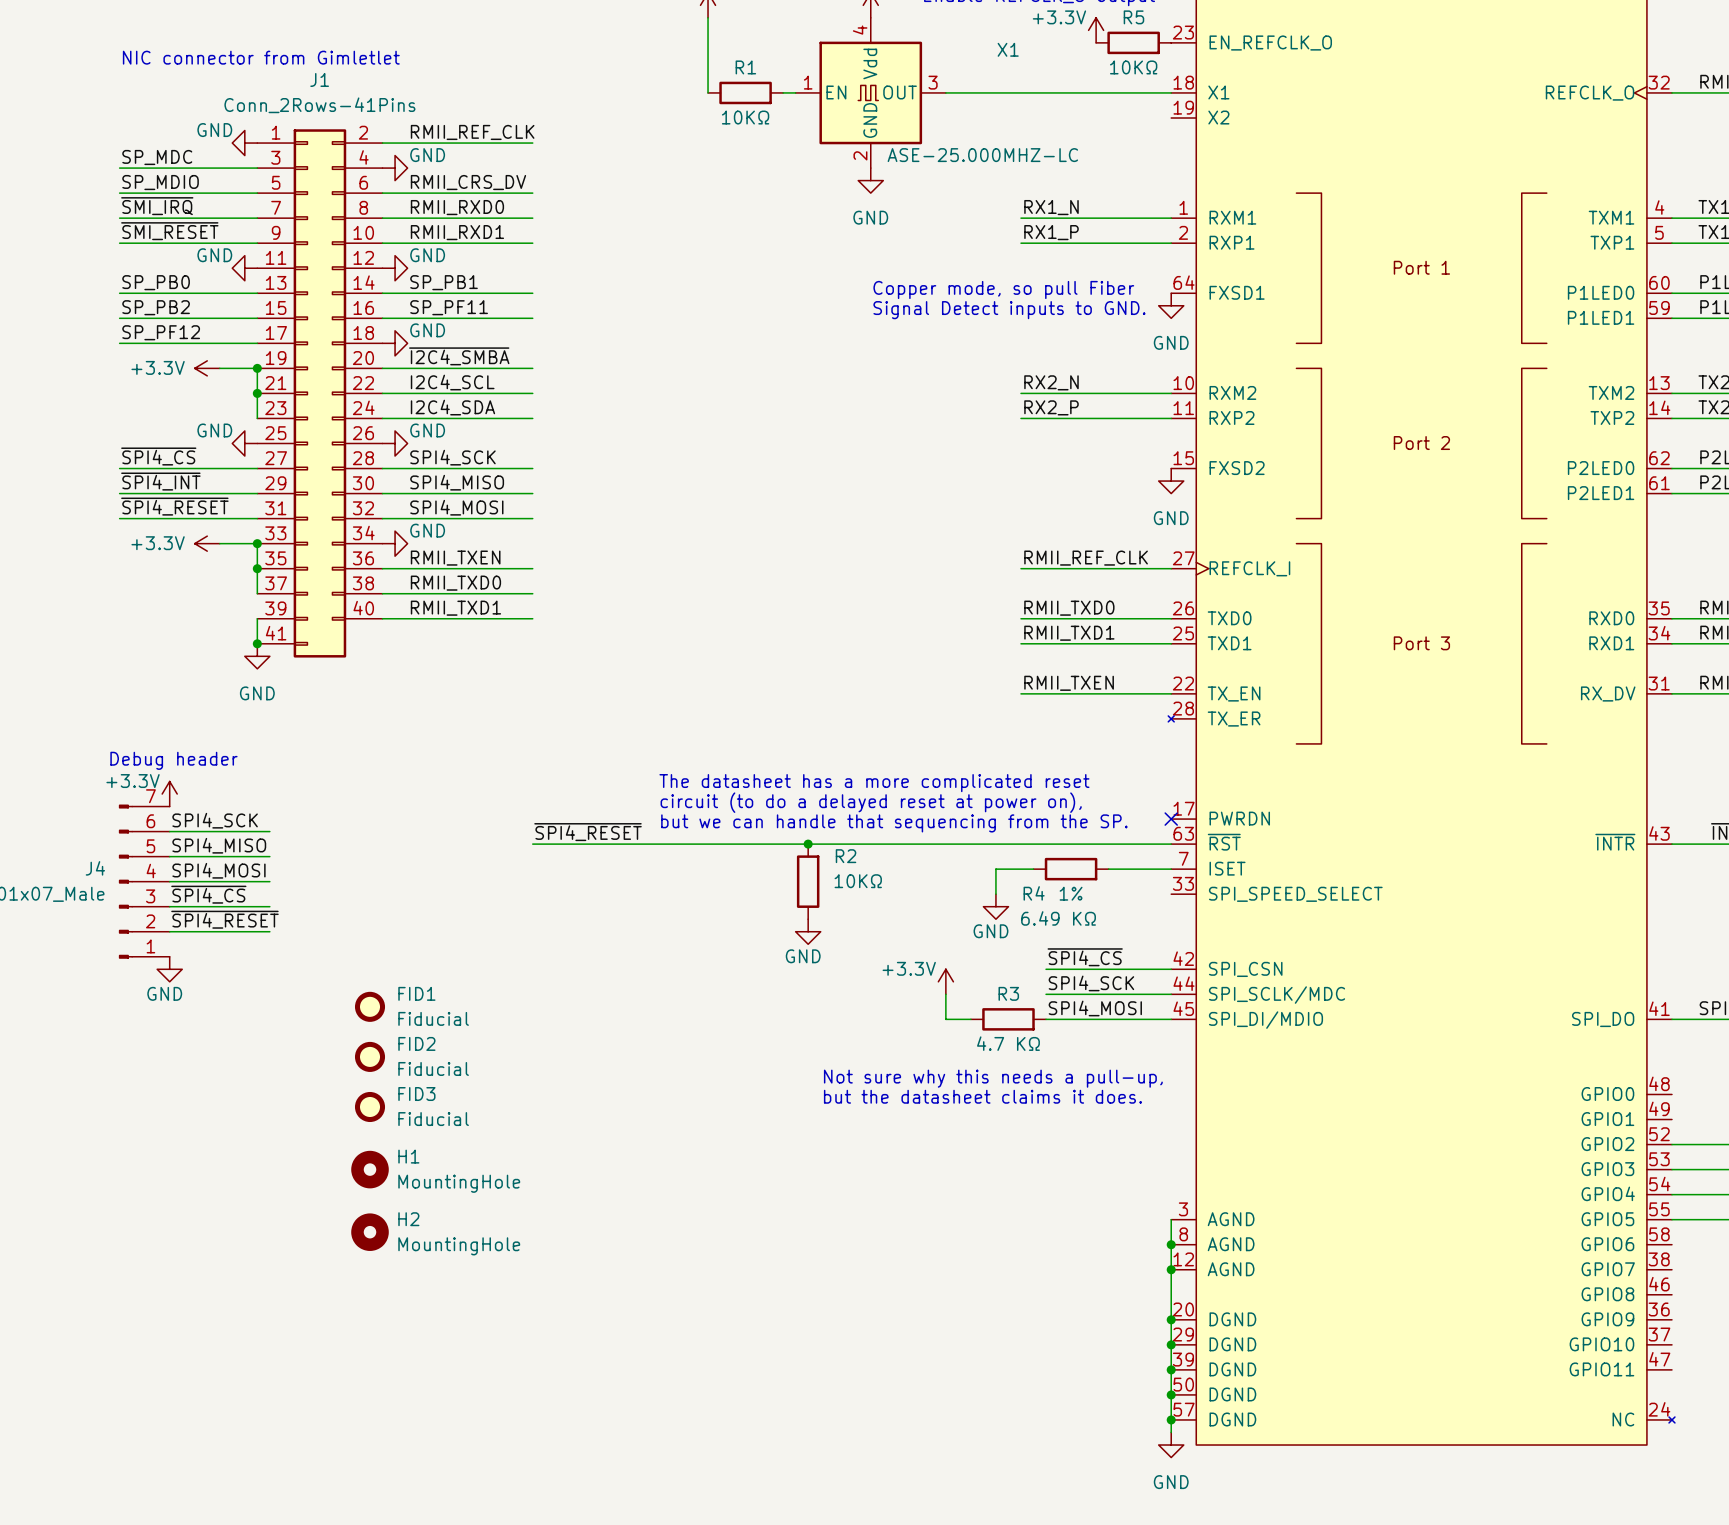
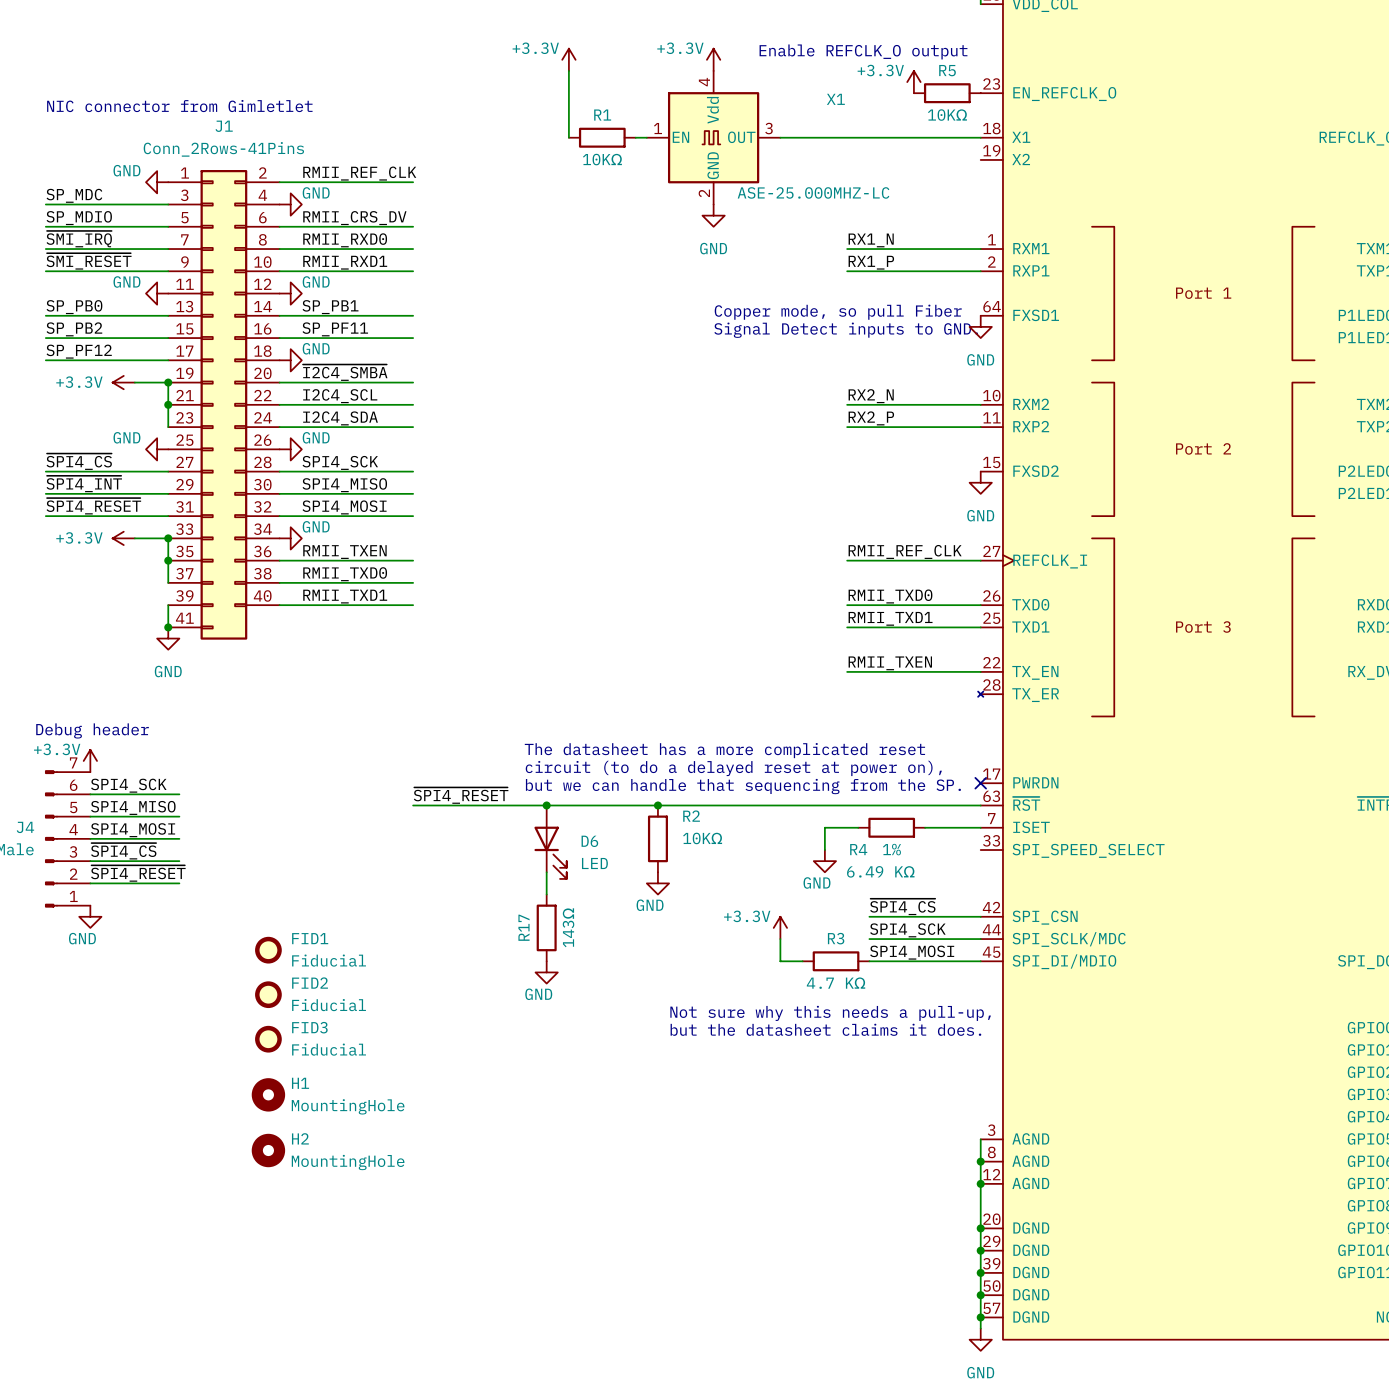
junction: none -> (546, 805)
D6: none -> LED (550, 842)
wire: none -> (546, 872) (546, 894)
R17: none -> 143Ω (546, 927)
power symbol: none -> GND (546, 972)

